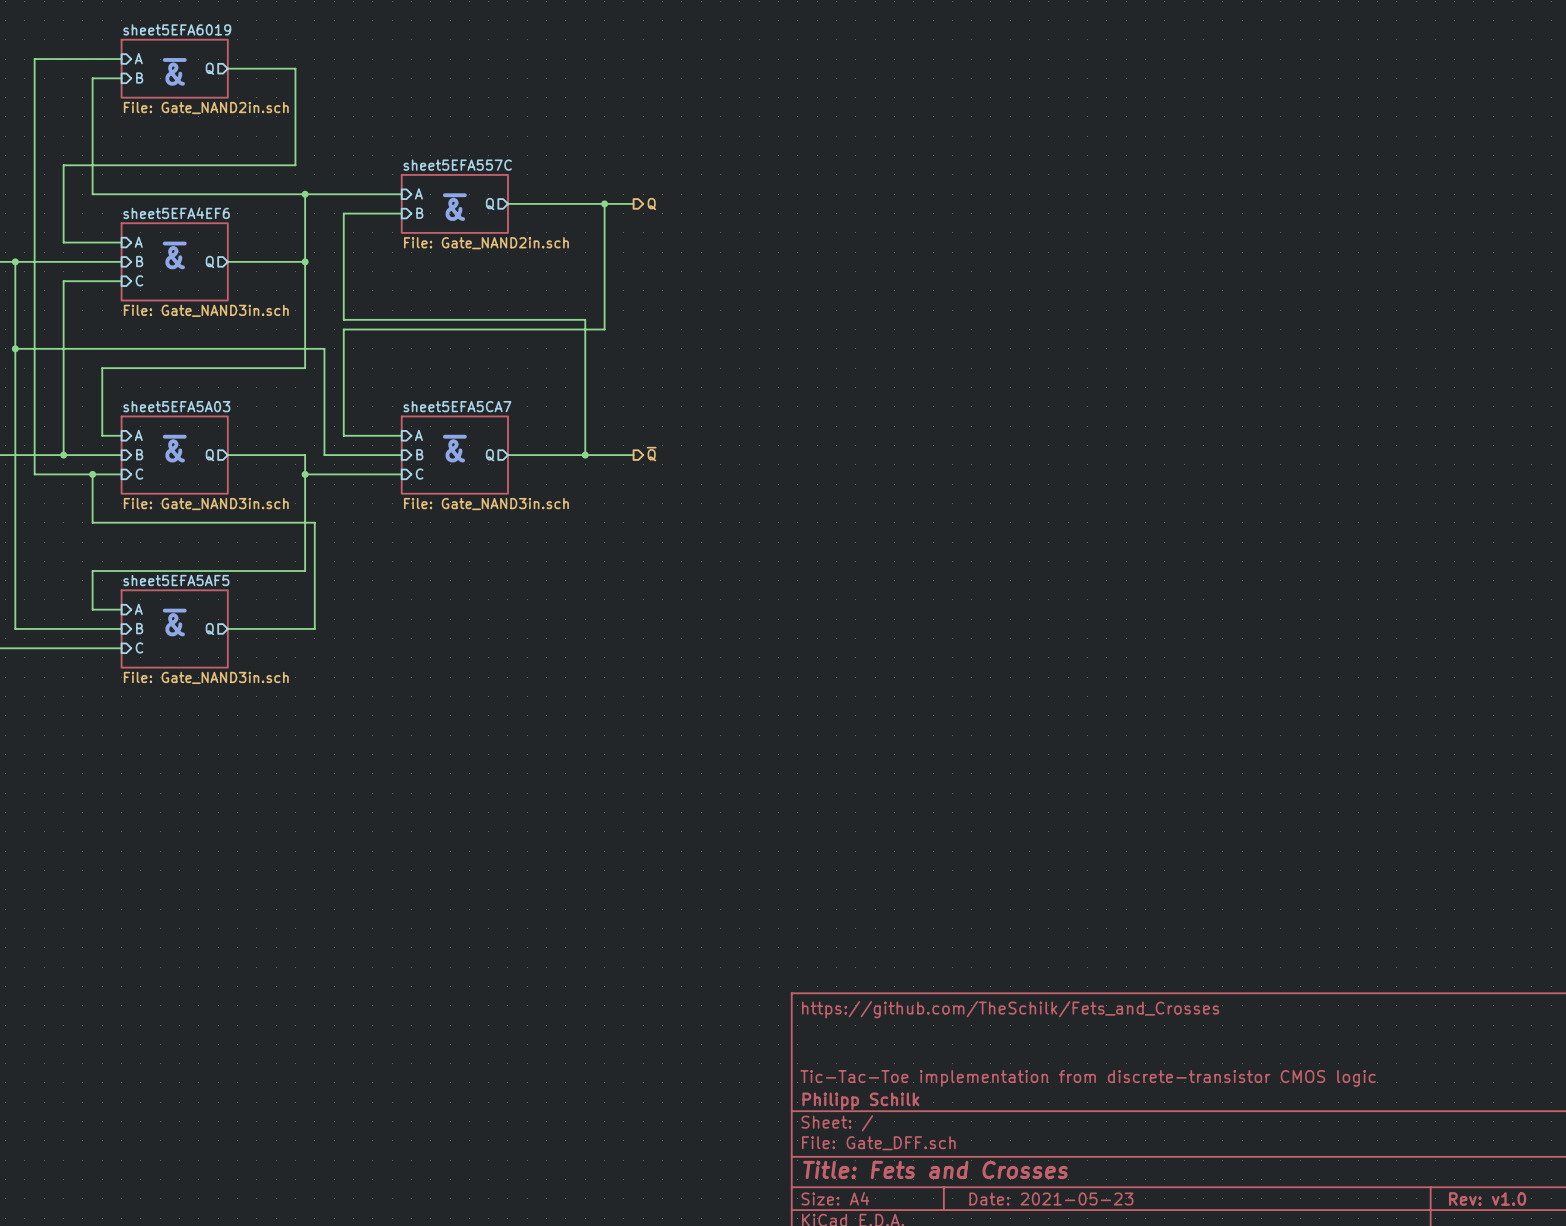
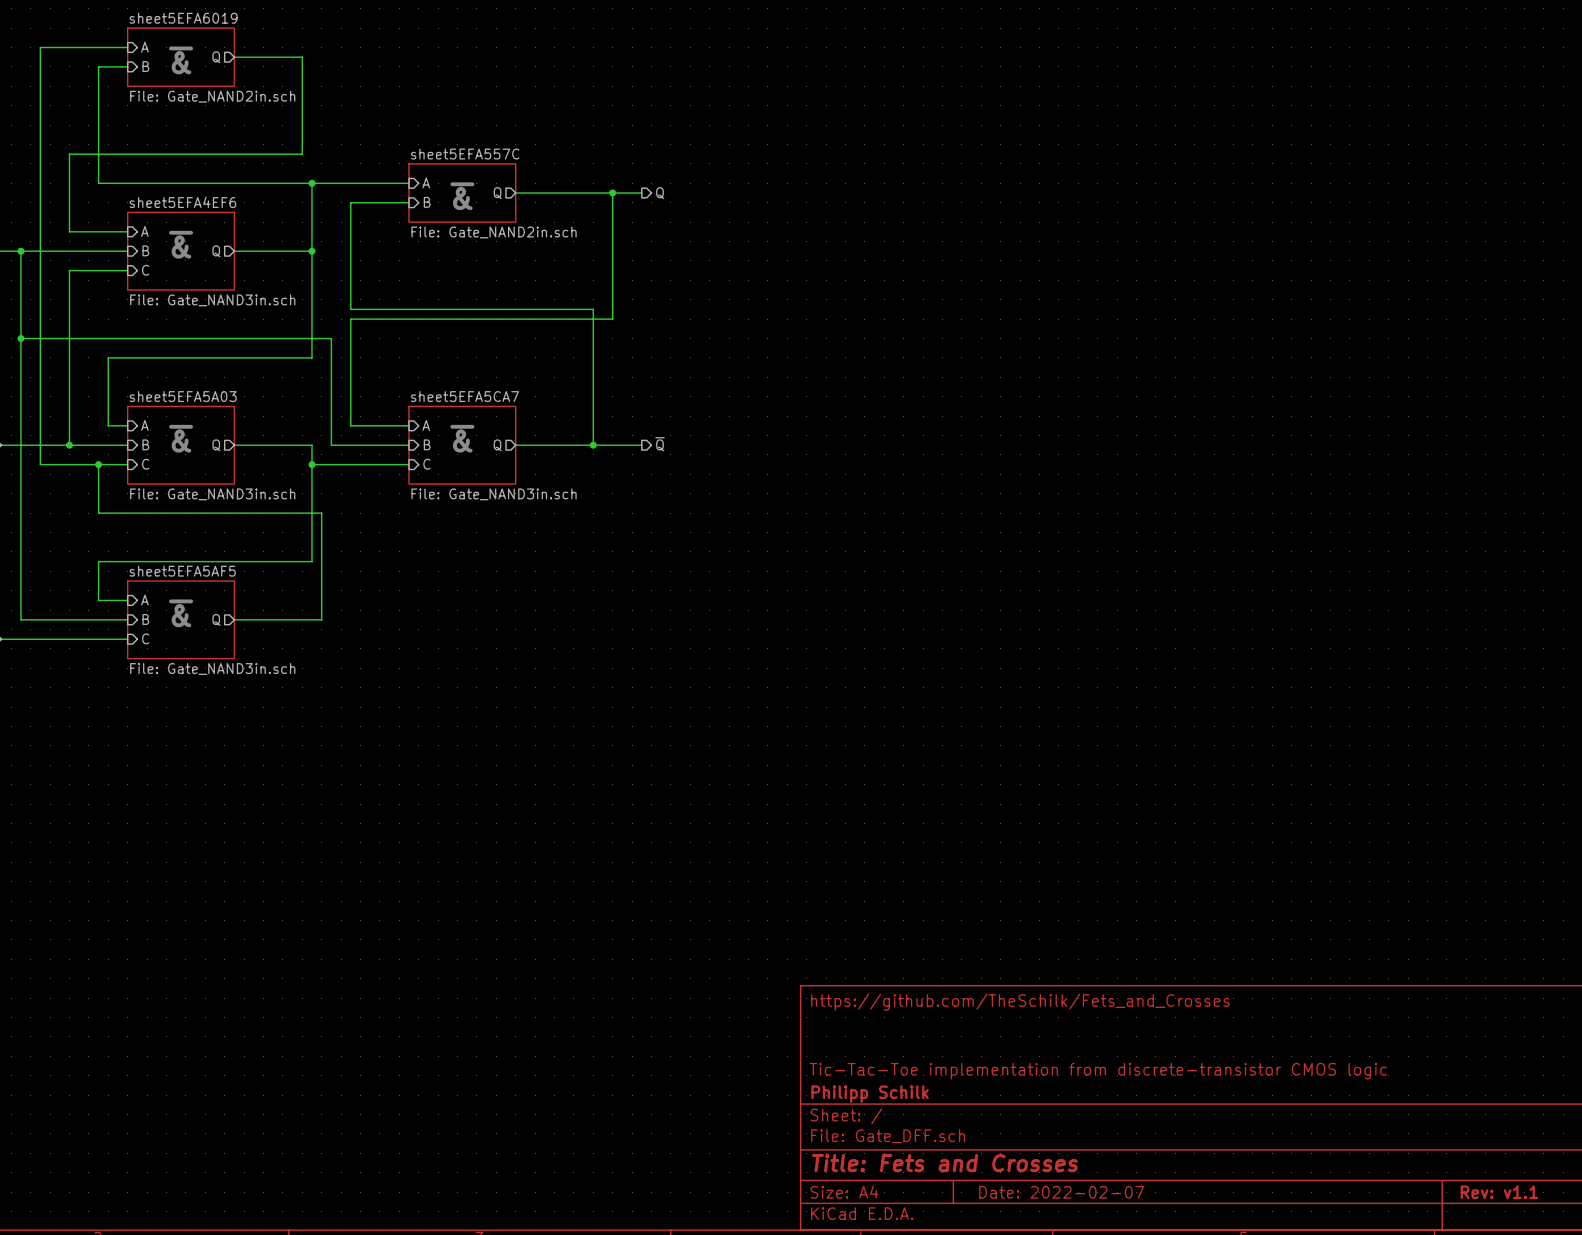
title block: Date: 2021-05-23 (1051, 1198) -> Date: 2022-02-07 (1061, 1192)
title block: Rev: v1.0 (1487, 1198) -> Rev: v1.1 (1499, 1192)

